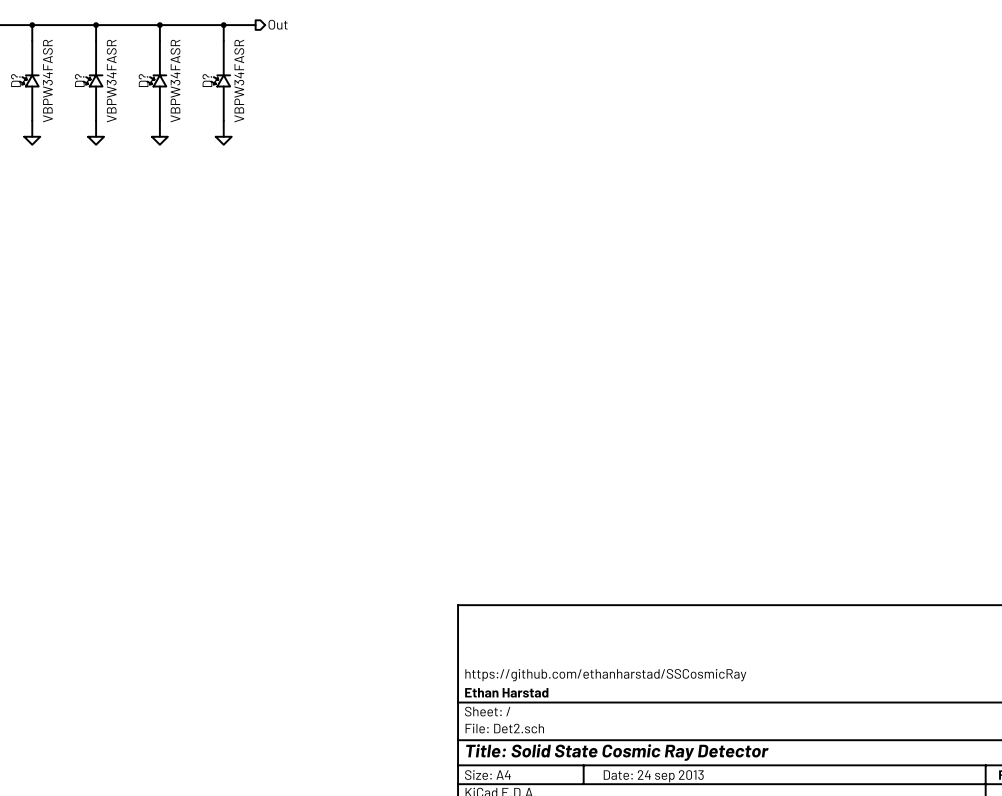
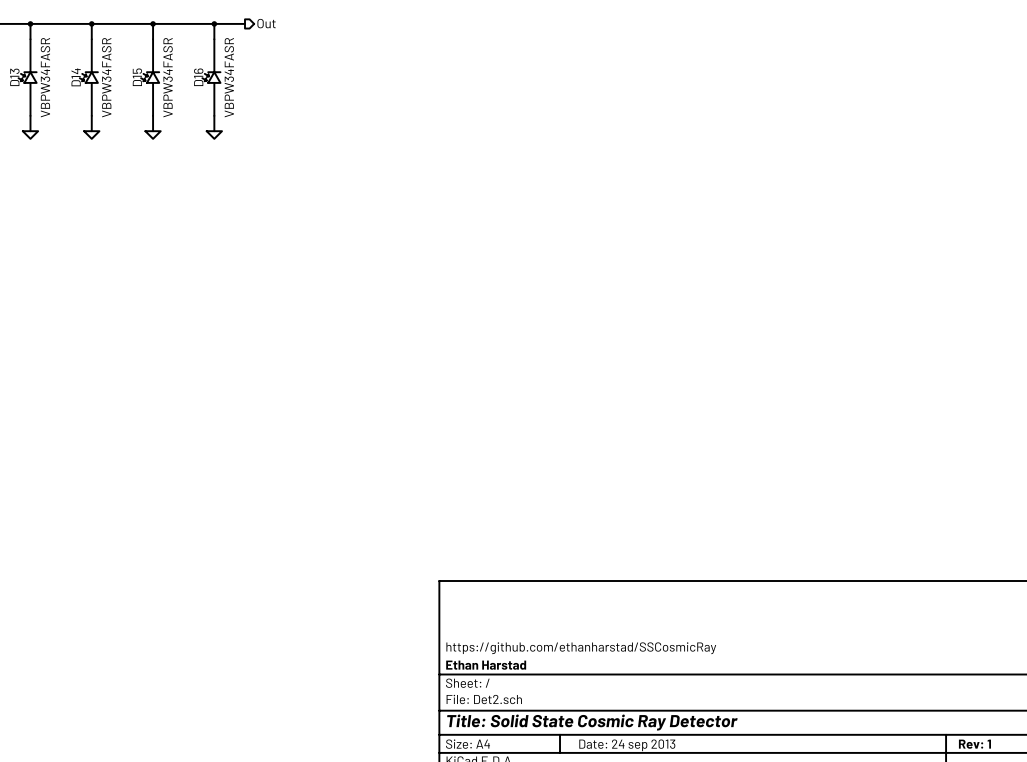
D? name: D? (15, 80) -> D13 (14, 77)
D? name: D? (79, 80) -> D14 (76, 77)
D? name: D? (143, 80) -> D15 (137, 77)
D? name: D? (207, 80) -> D16 (198, 77)

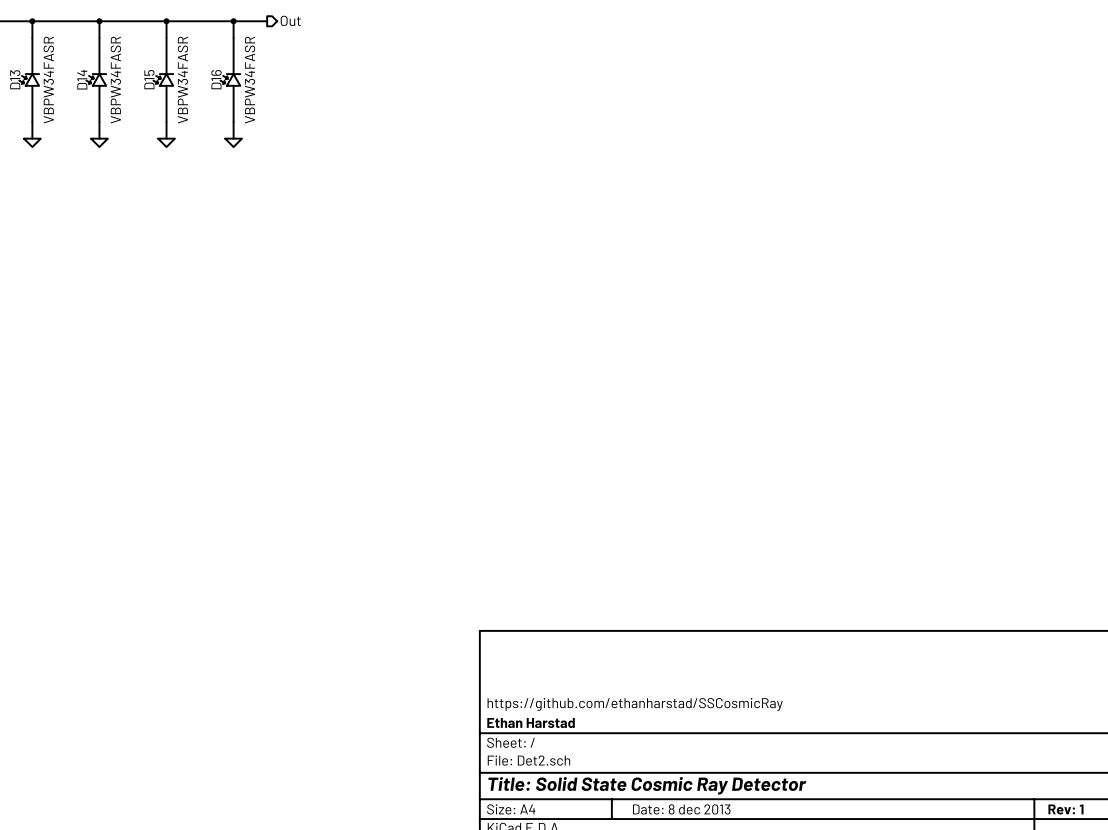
title block: Date: 24 sep 2013 (627, 745) -> Date: 8 dec 2013 (681, 809)

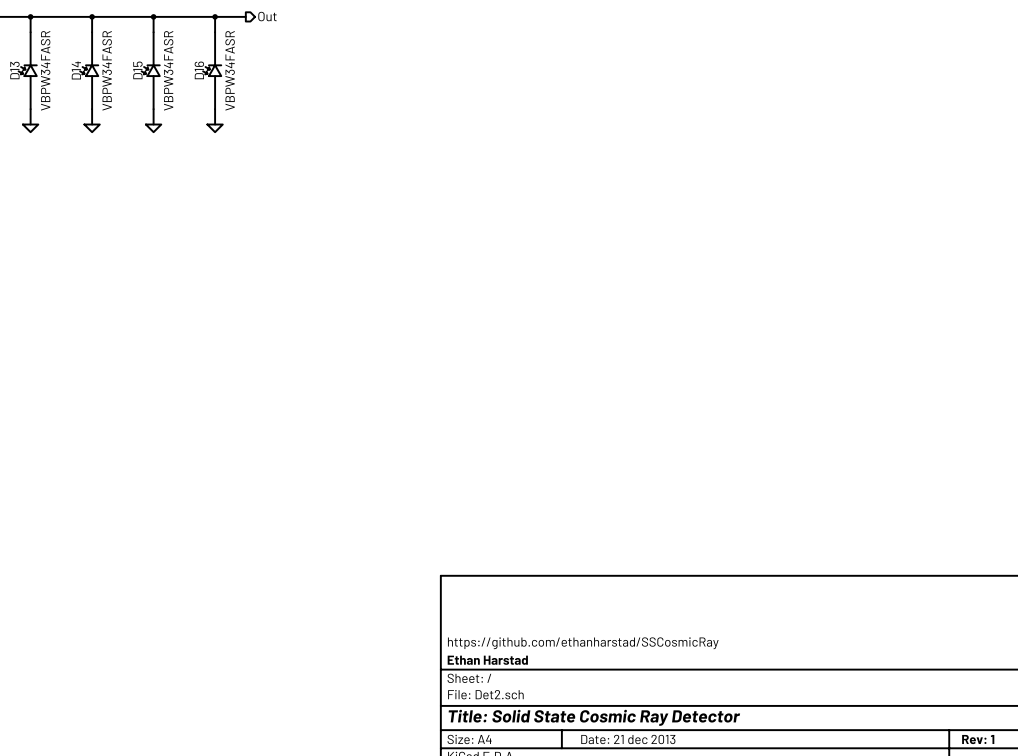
title block: Date: 8 dec 2013 (681, 809) -> Date: 21 dec 2013 (628, 739)

